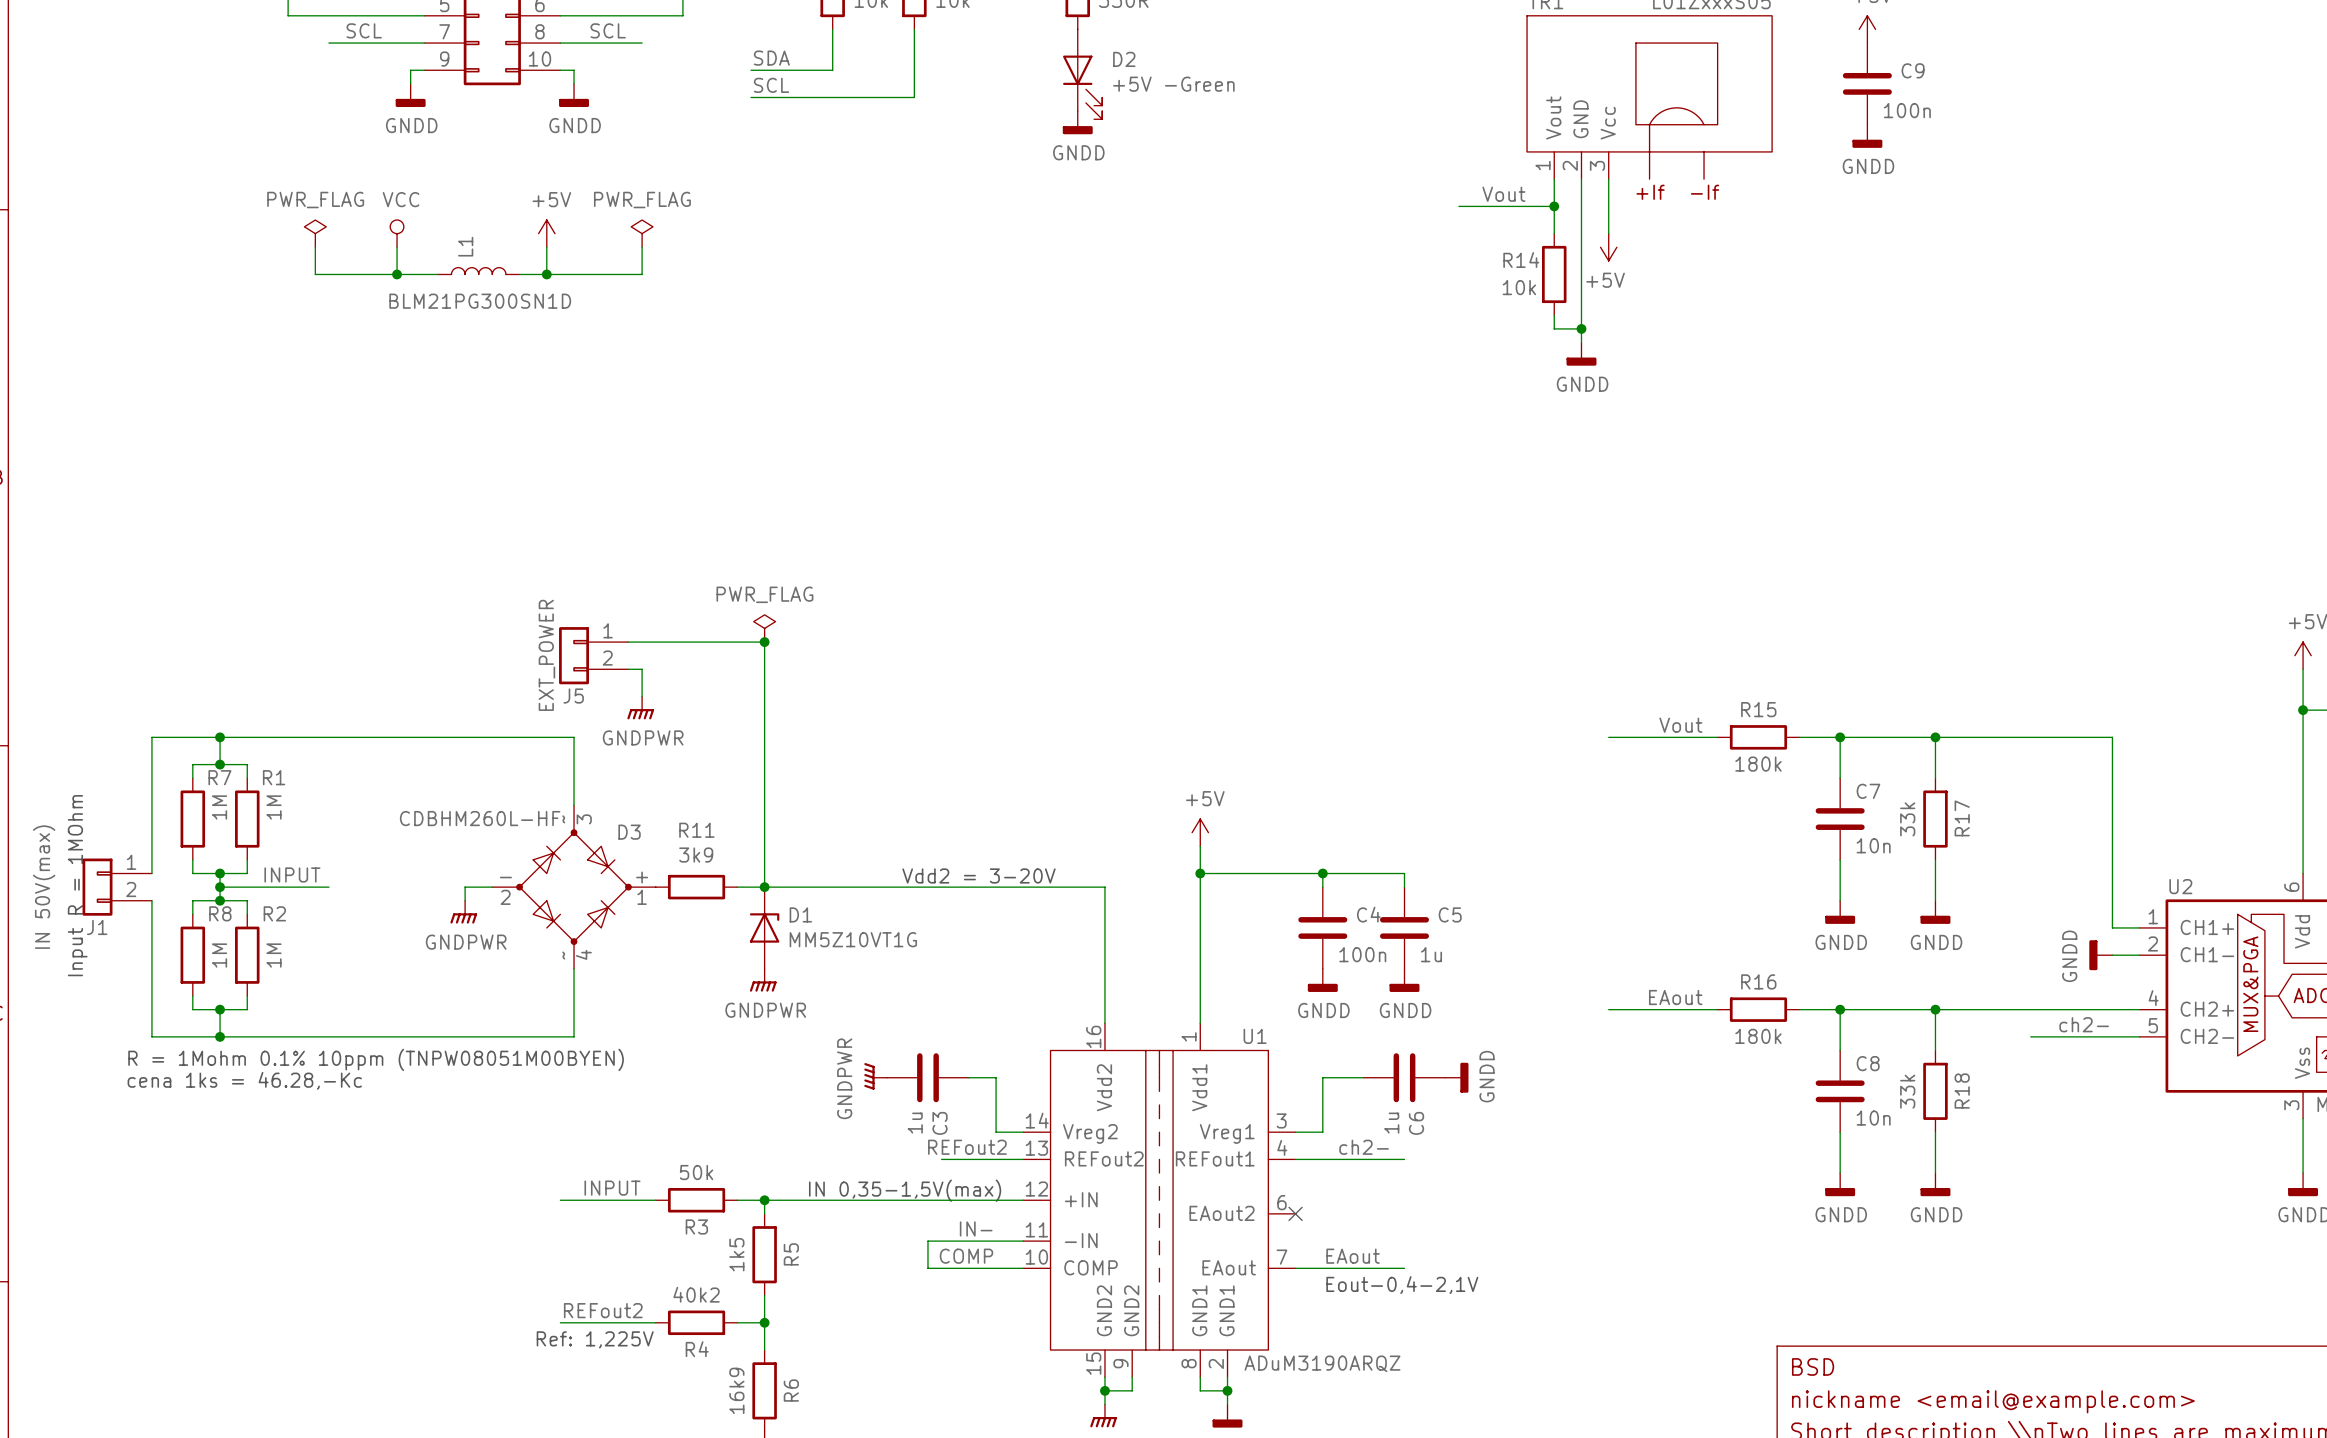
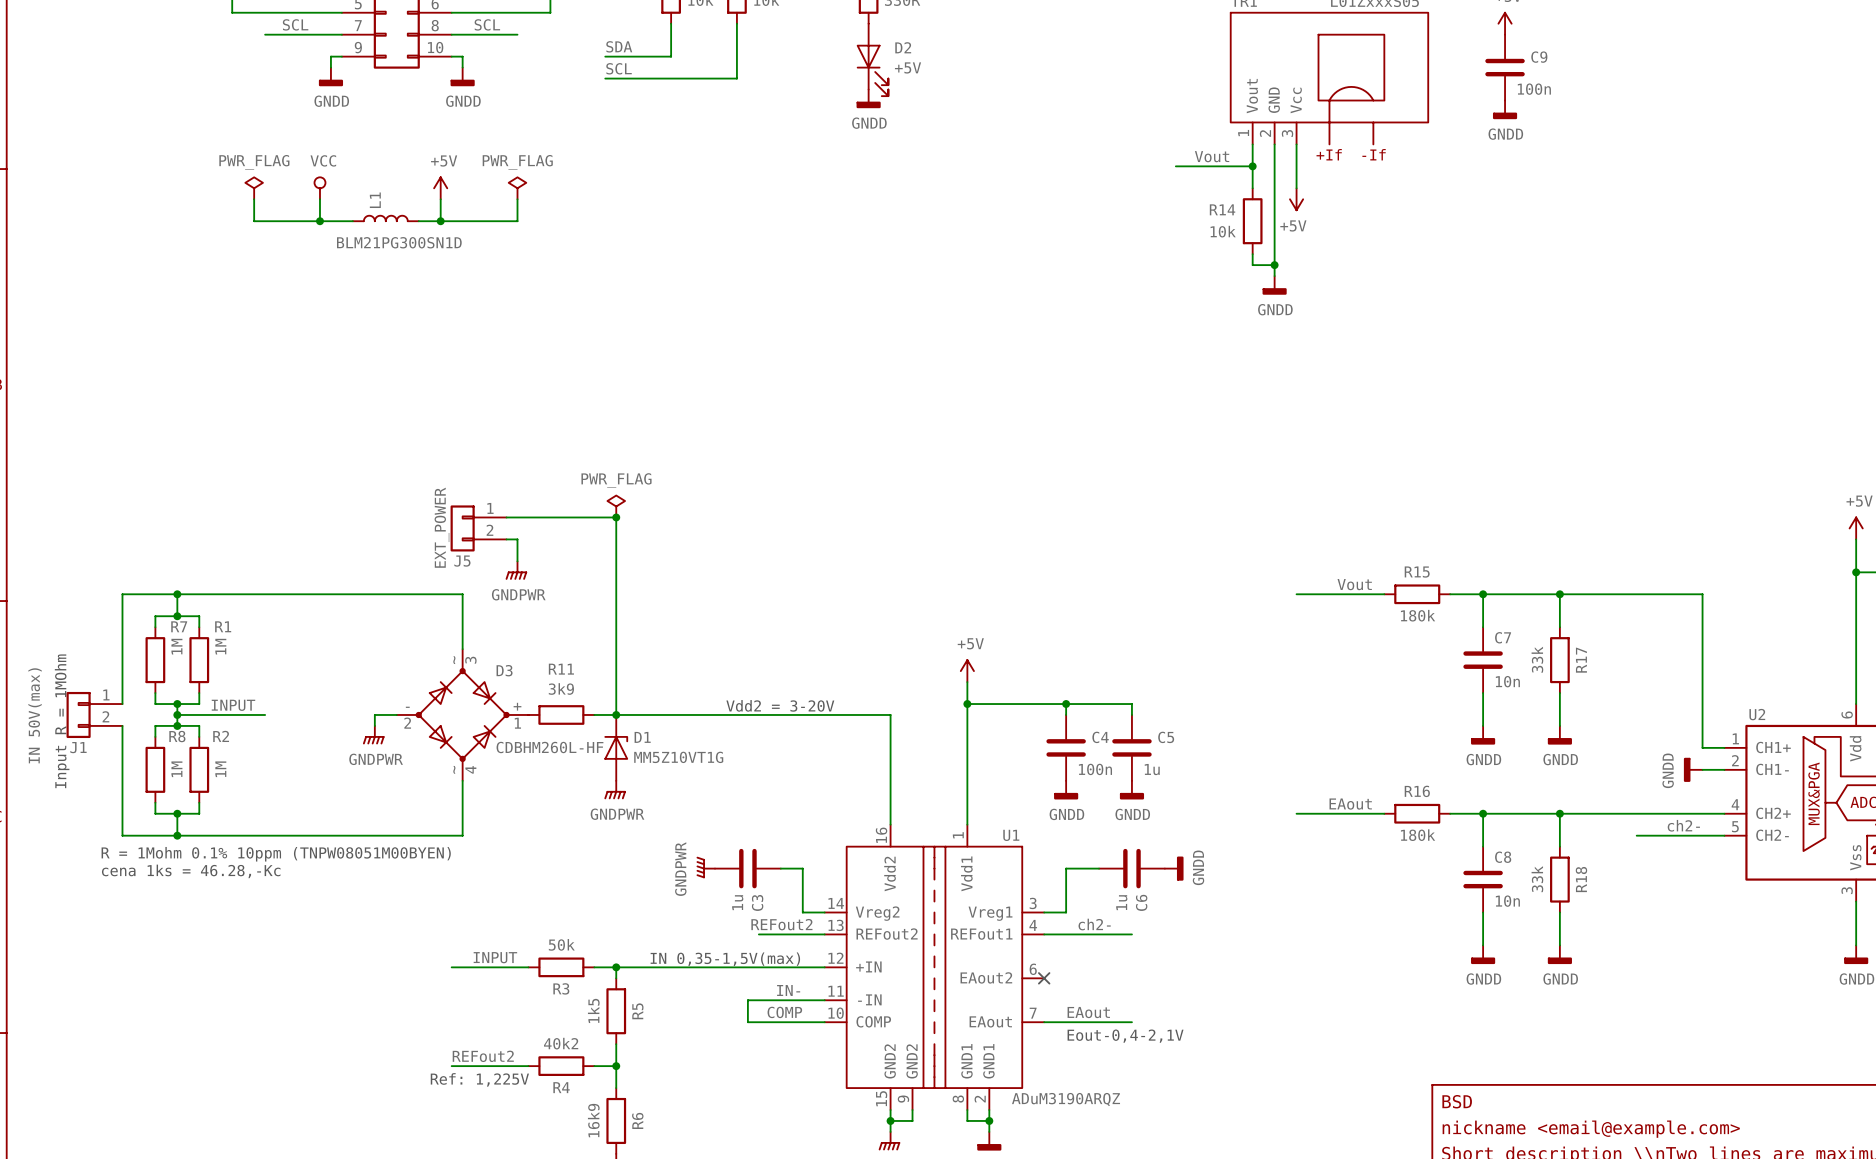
D2 value: +5V -Green (1173, 84) -> +5V (908, 67)
D3 value position: CDBHM260L-HF (480, 818) -> CDBHM260L-HF (549, 747)

